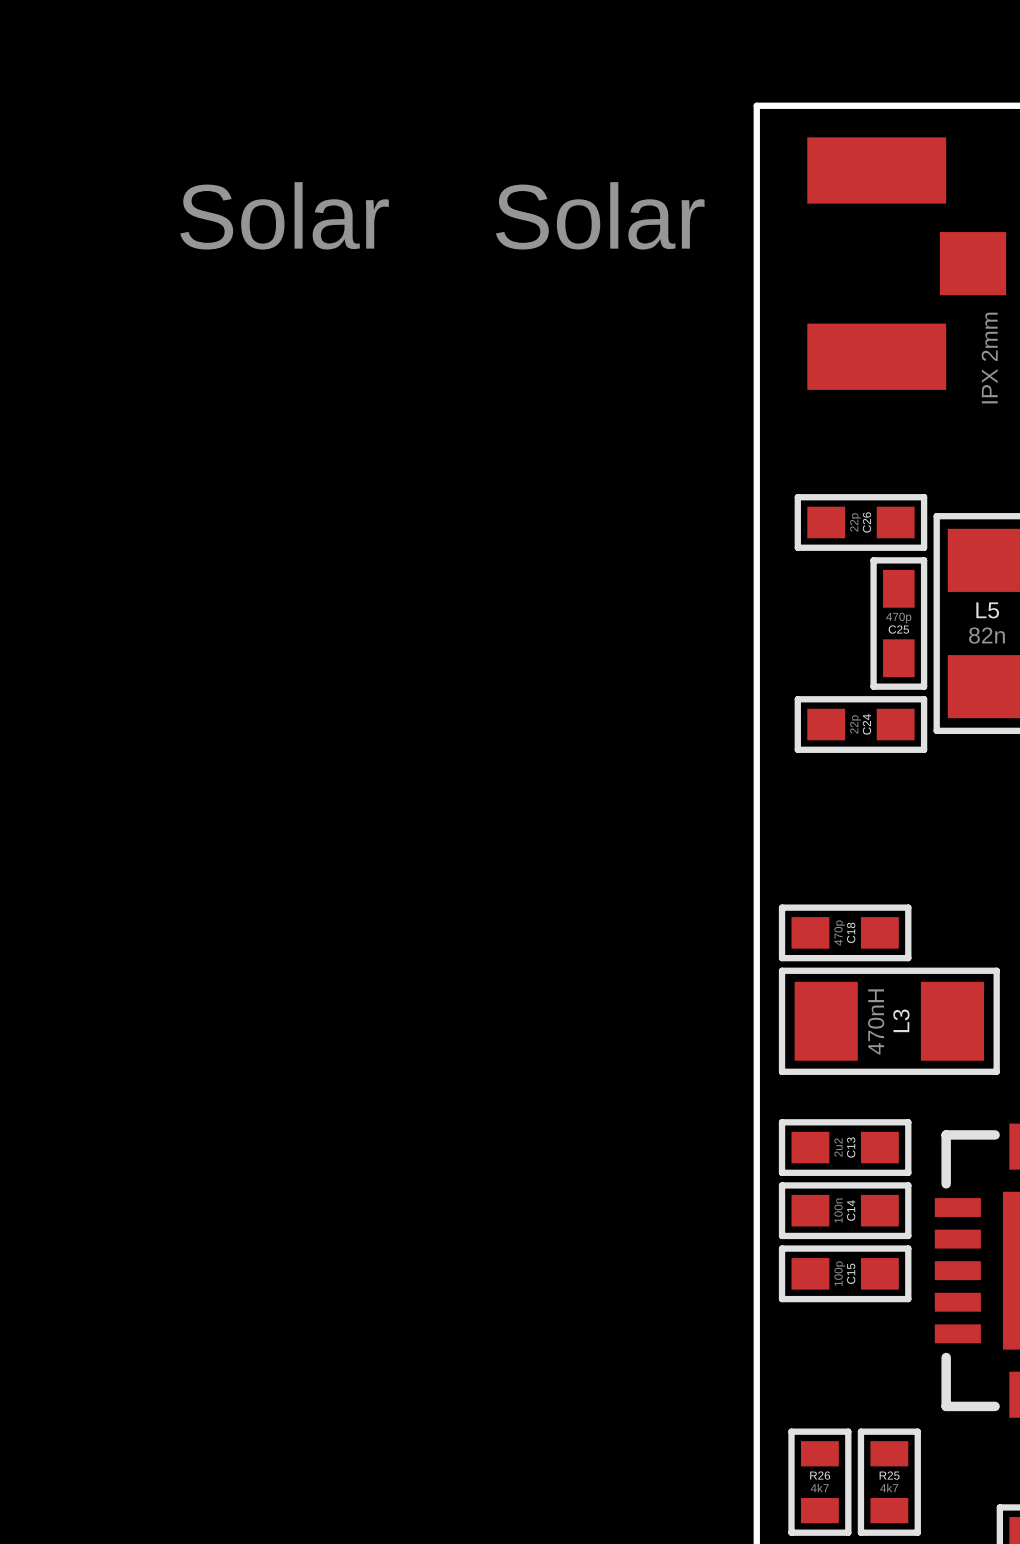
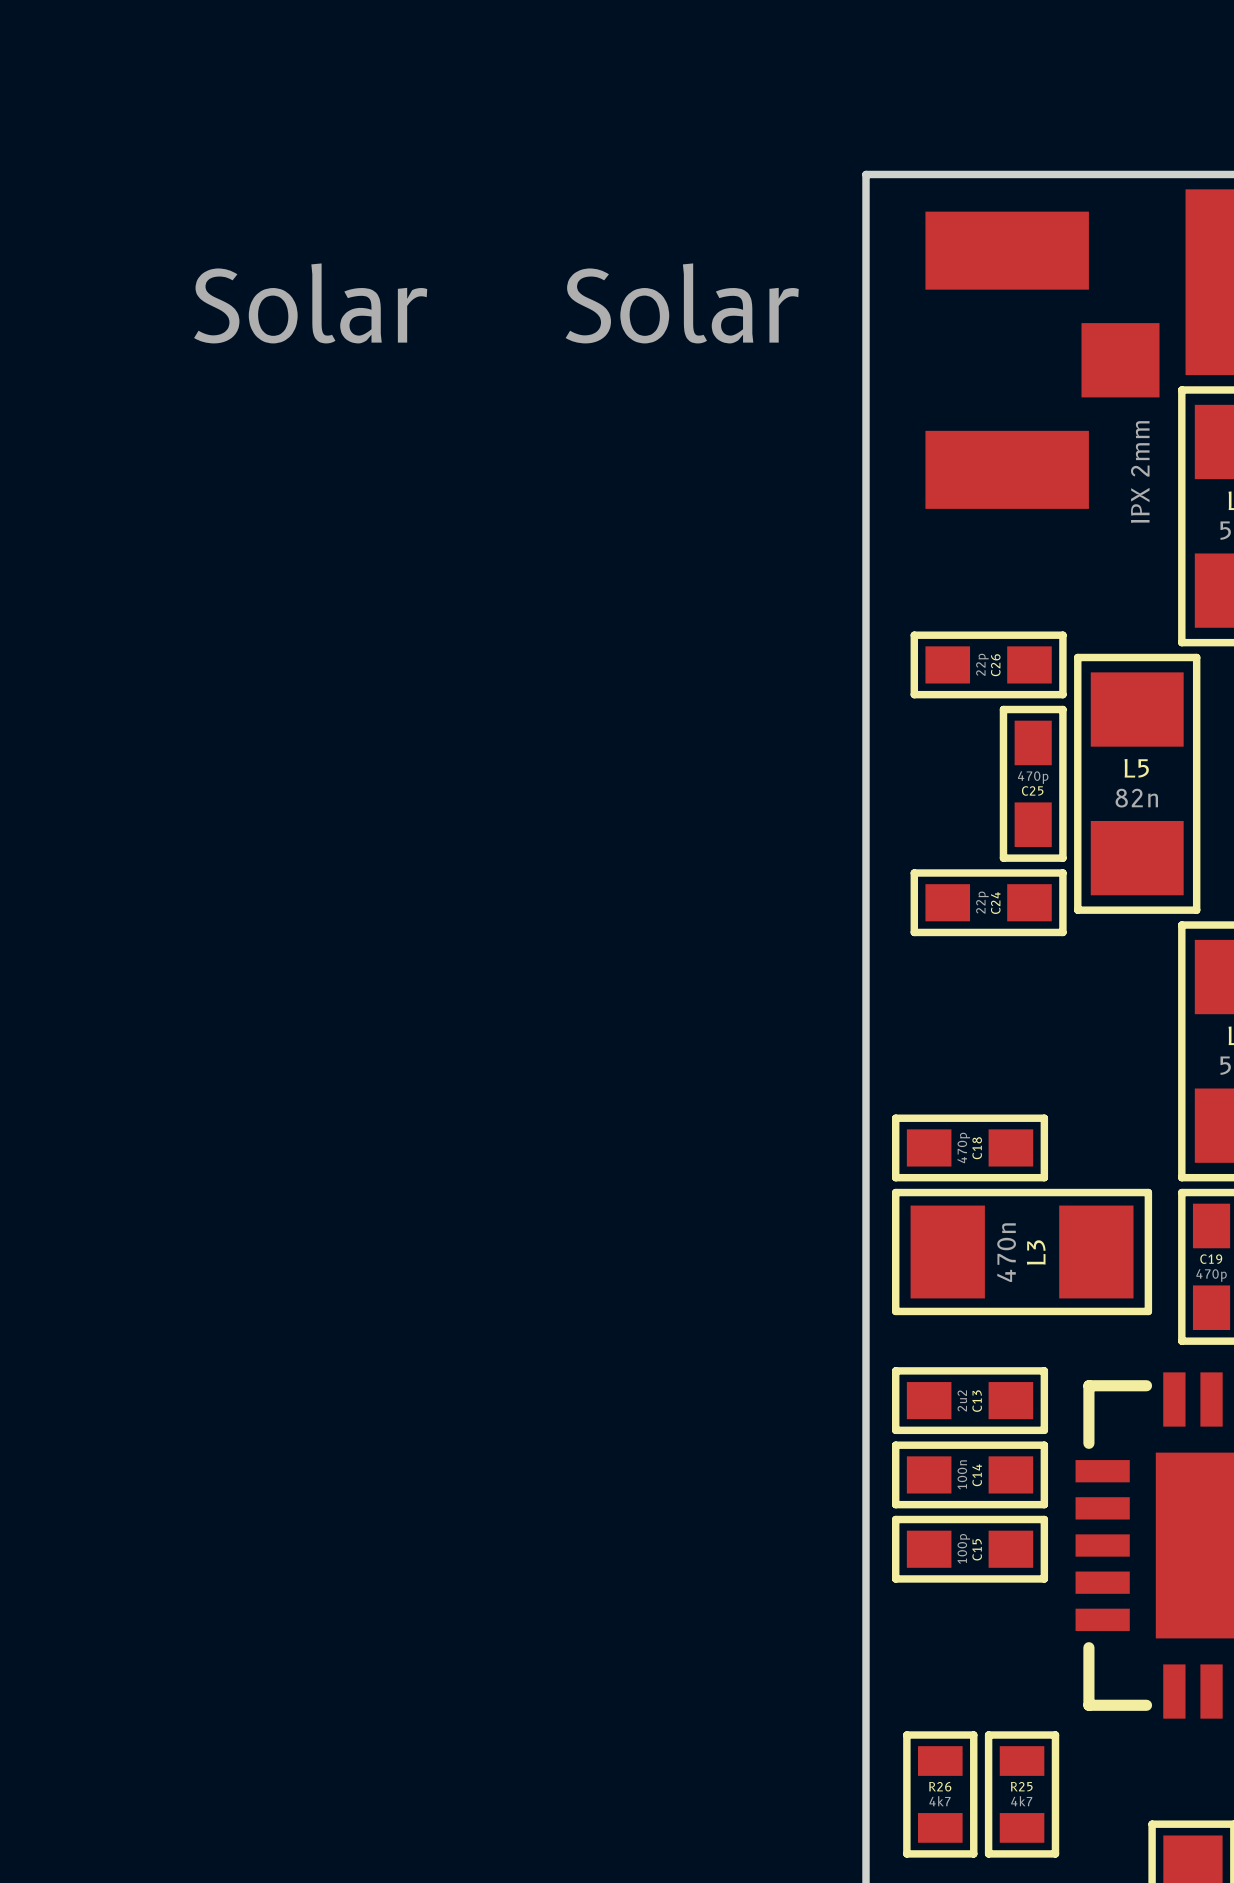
L3 value: 470nH (876, 1021) -> 470n (1006, 1252)

